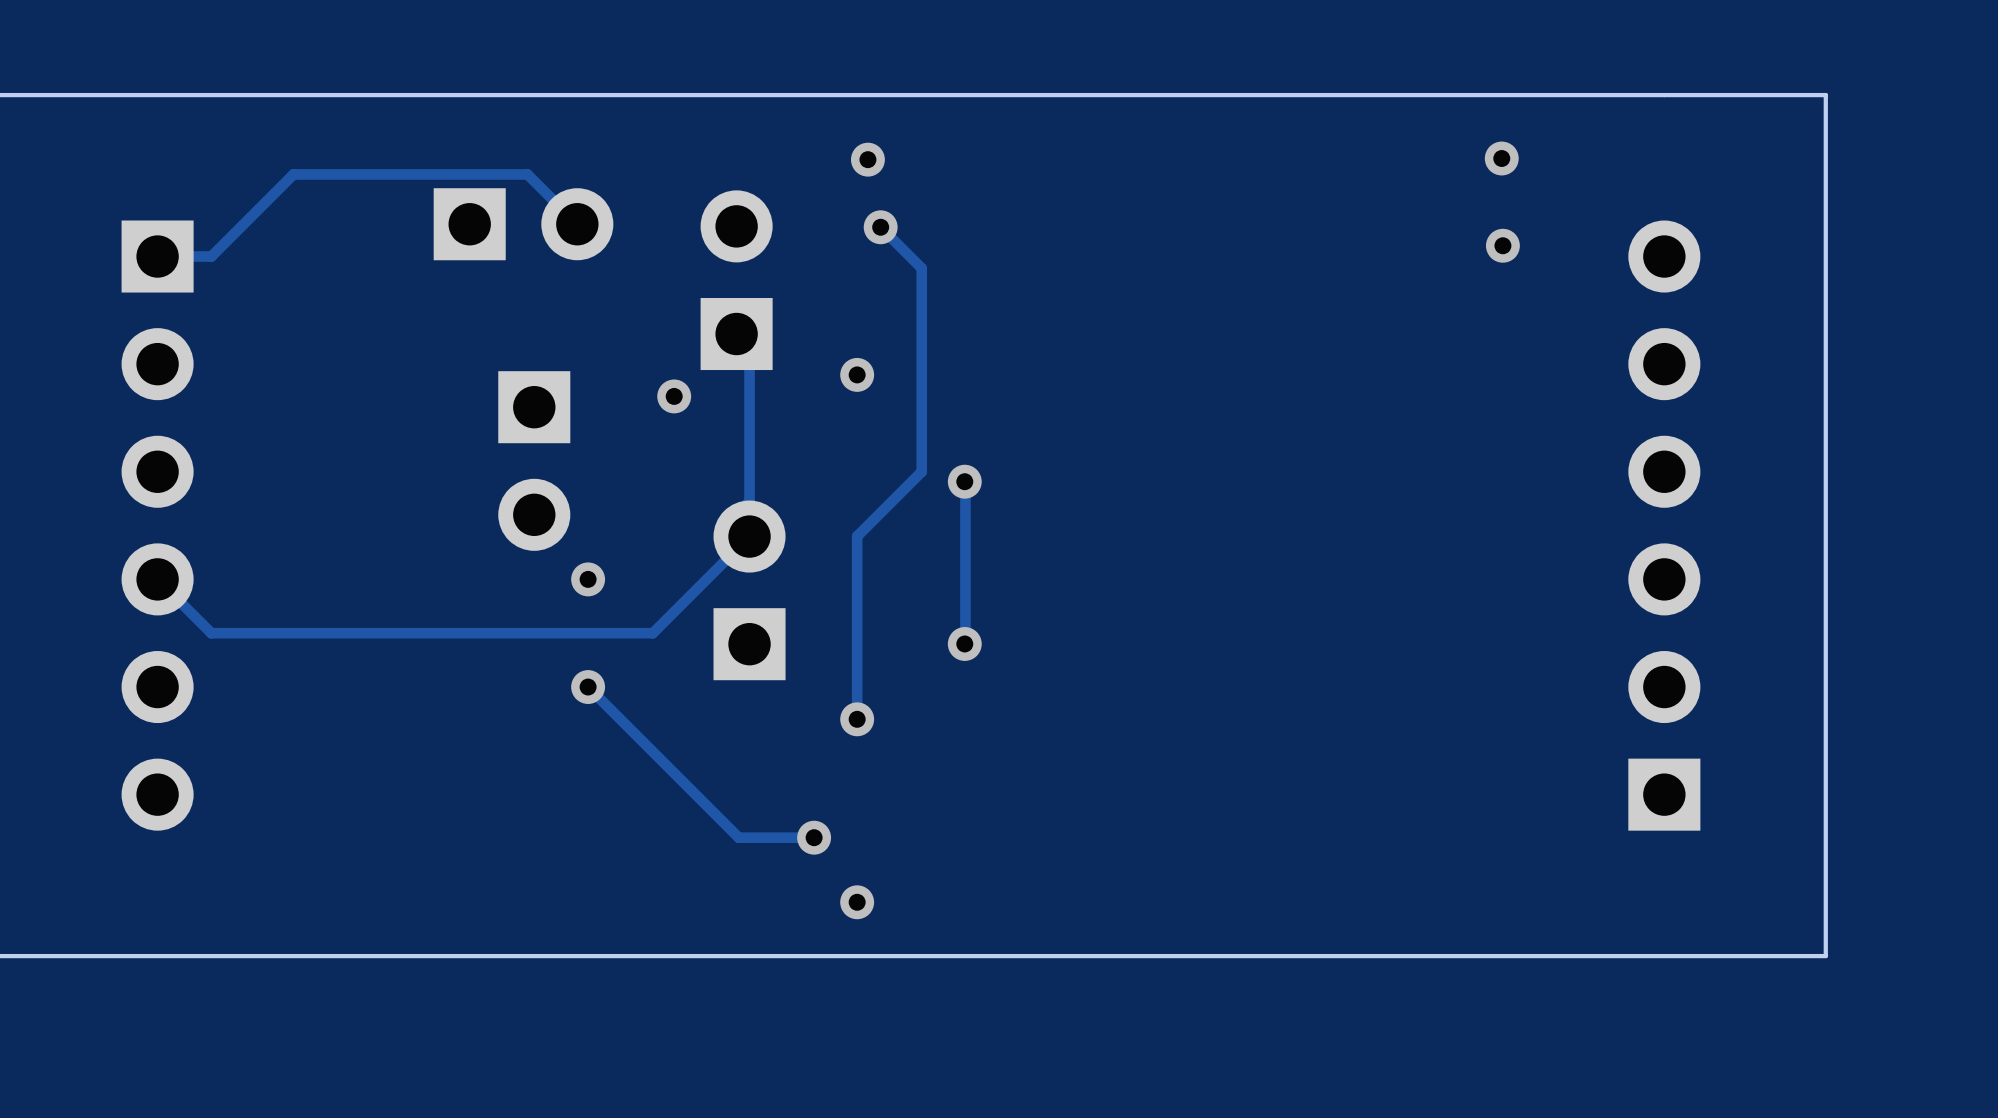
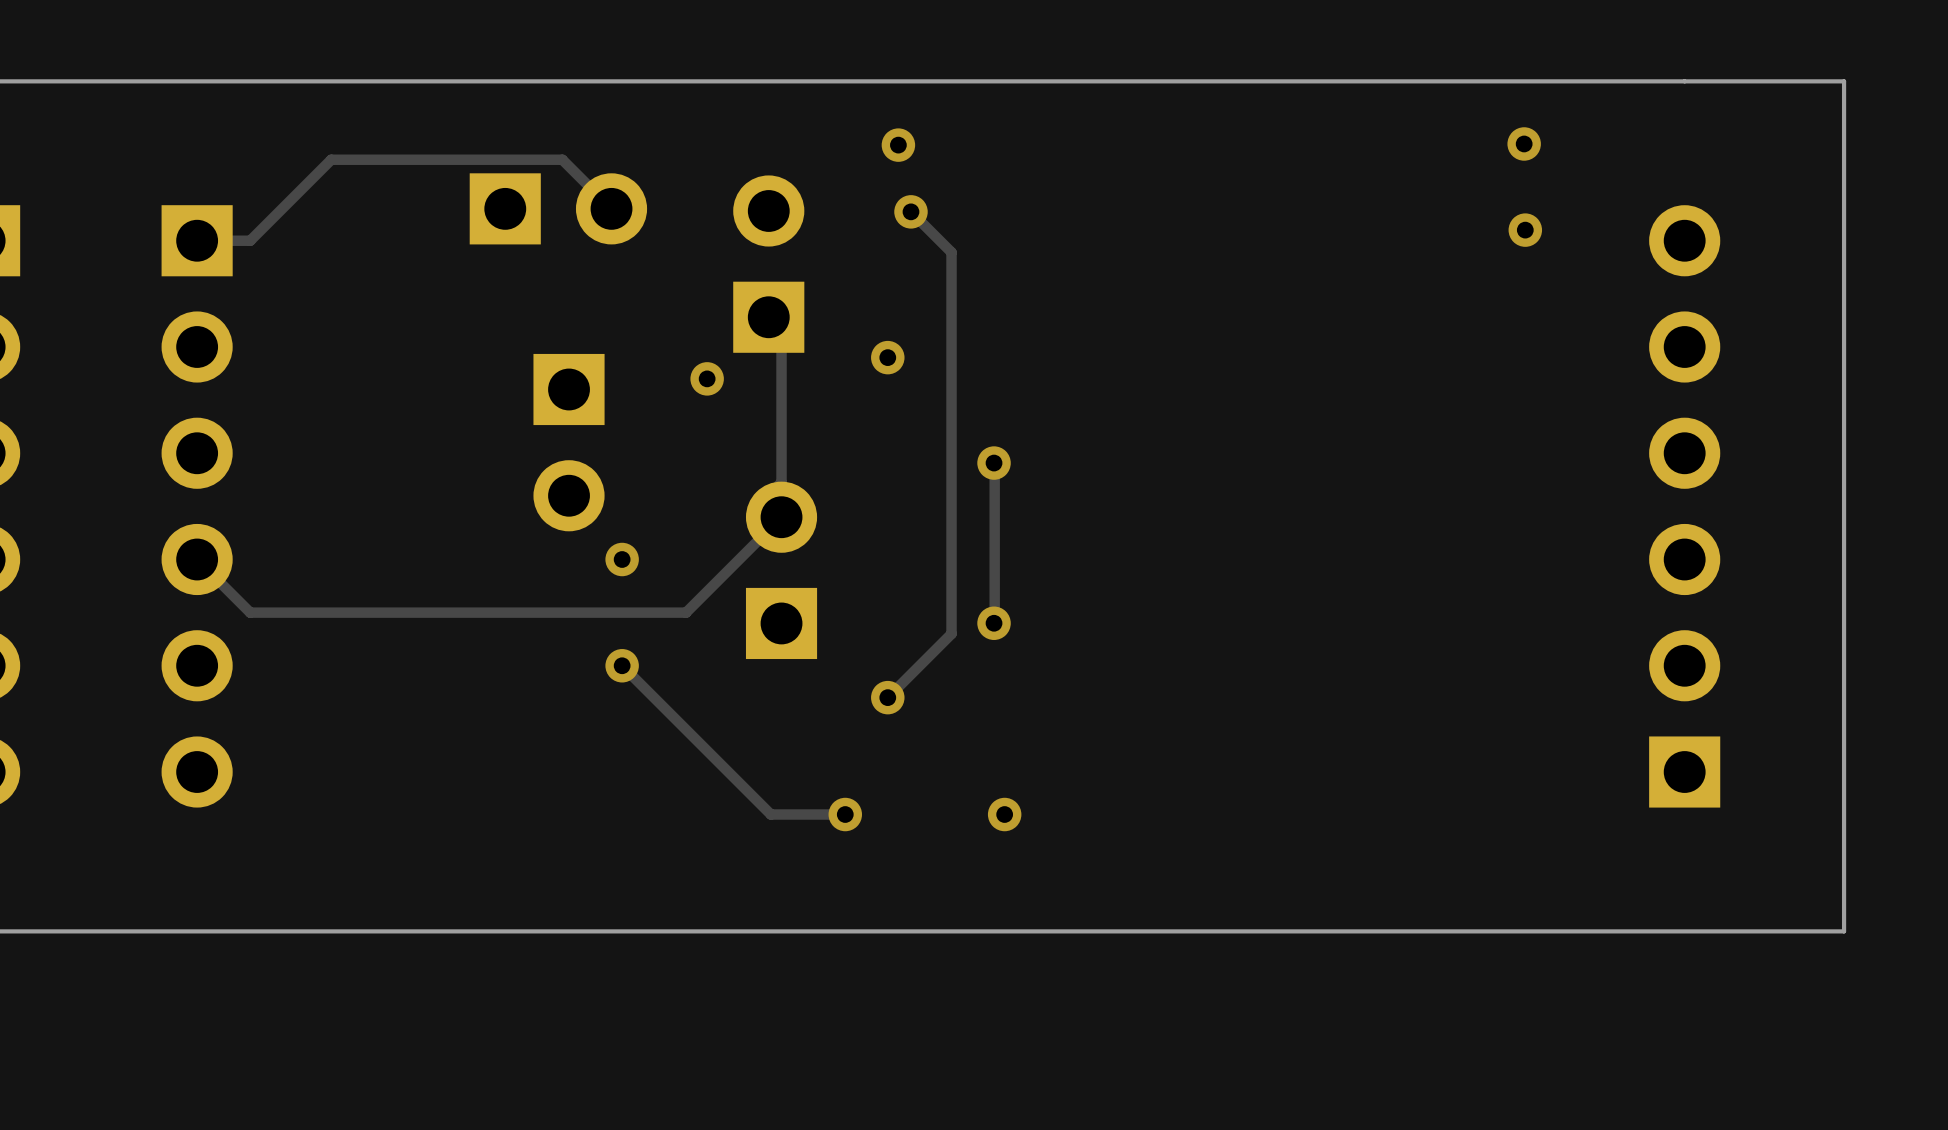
track: (921, 471) (857, 536) (857, 719) -> (951, 453) (951, 633) (887, 697)
via position: (857, 902) -> (1004, 814)

